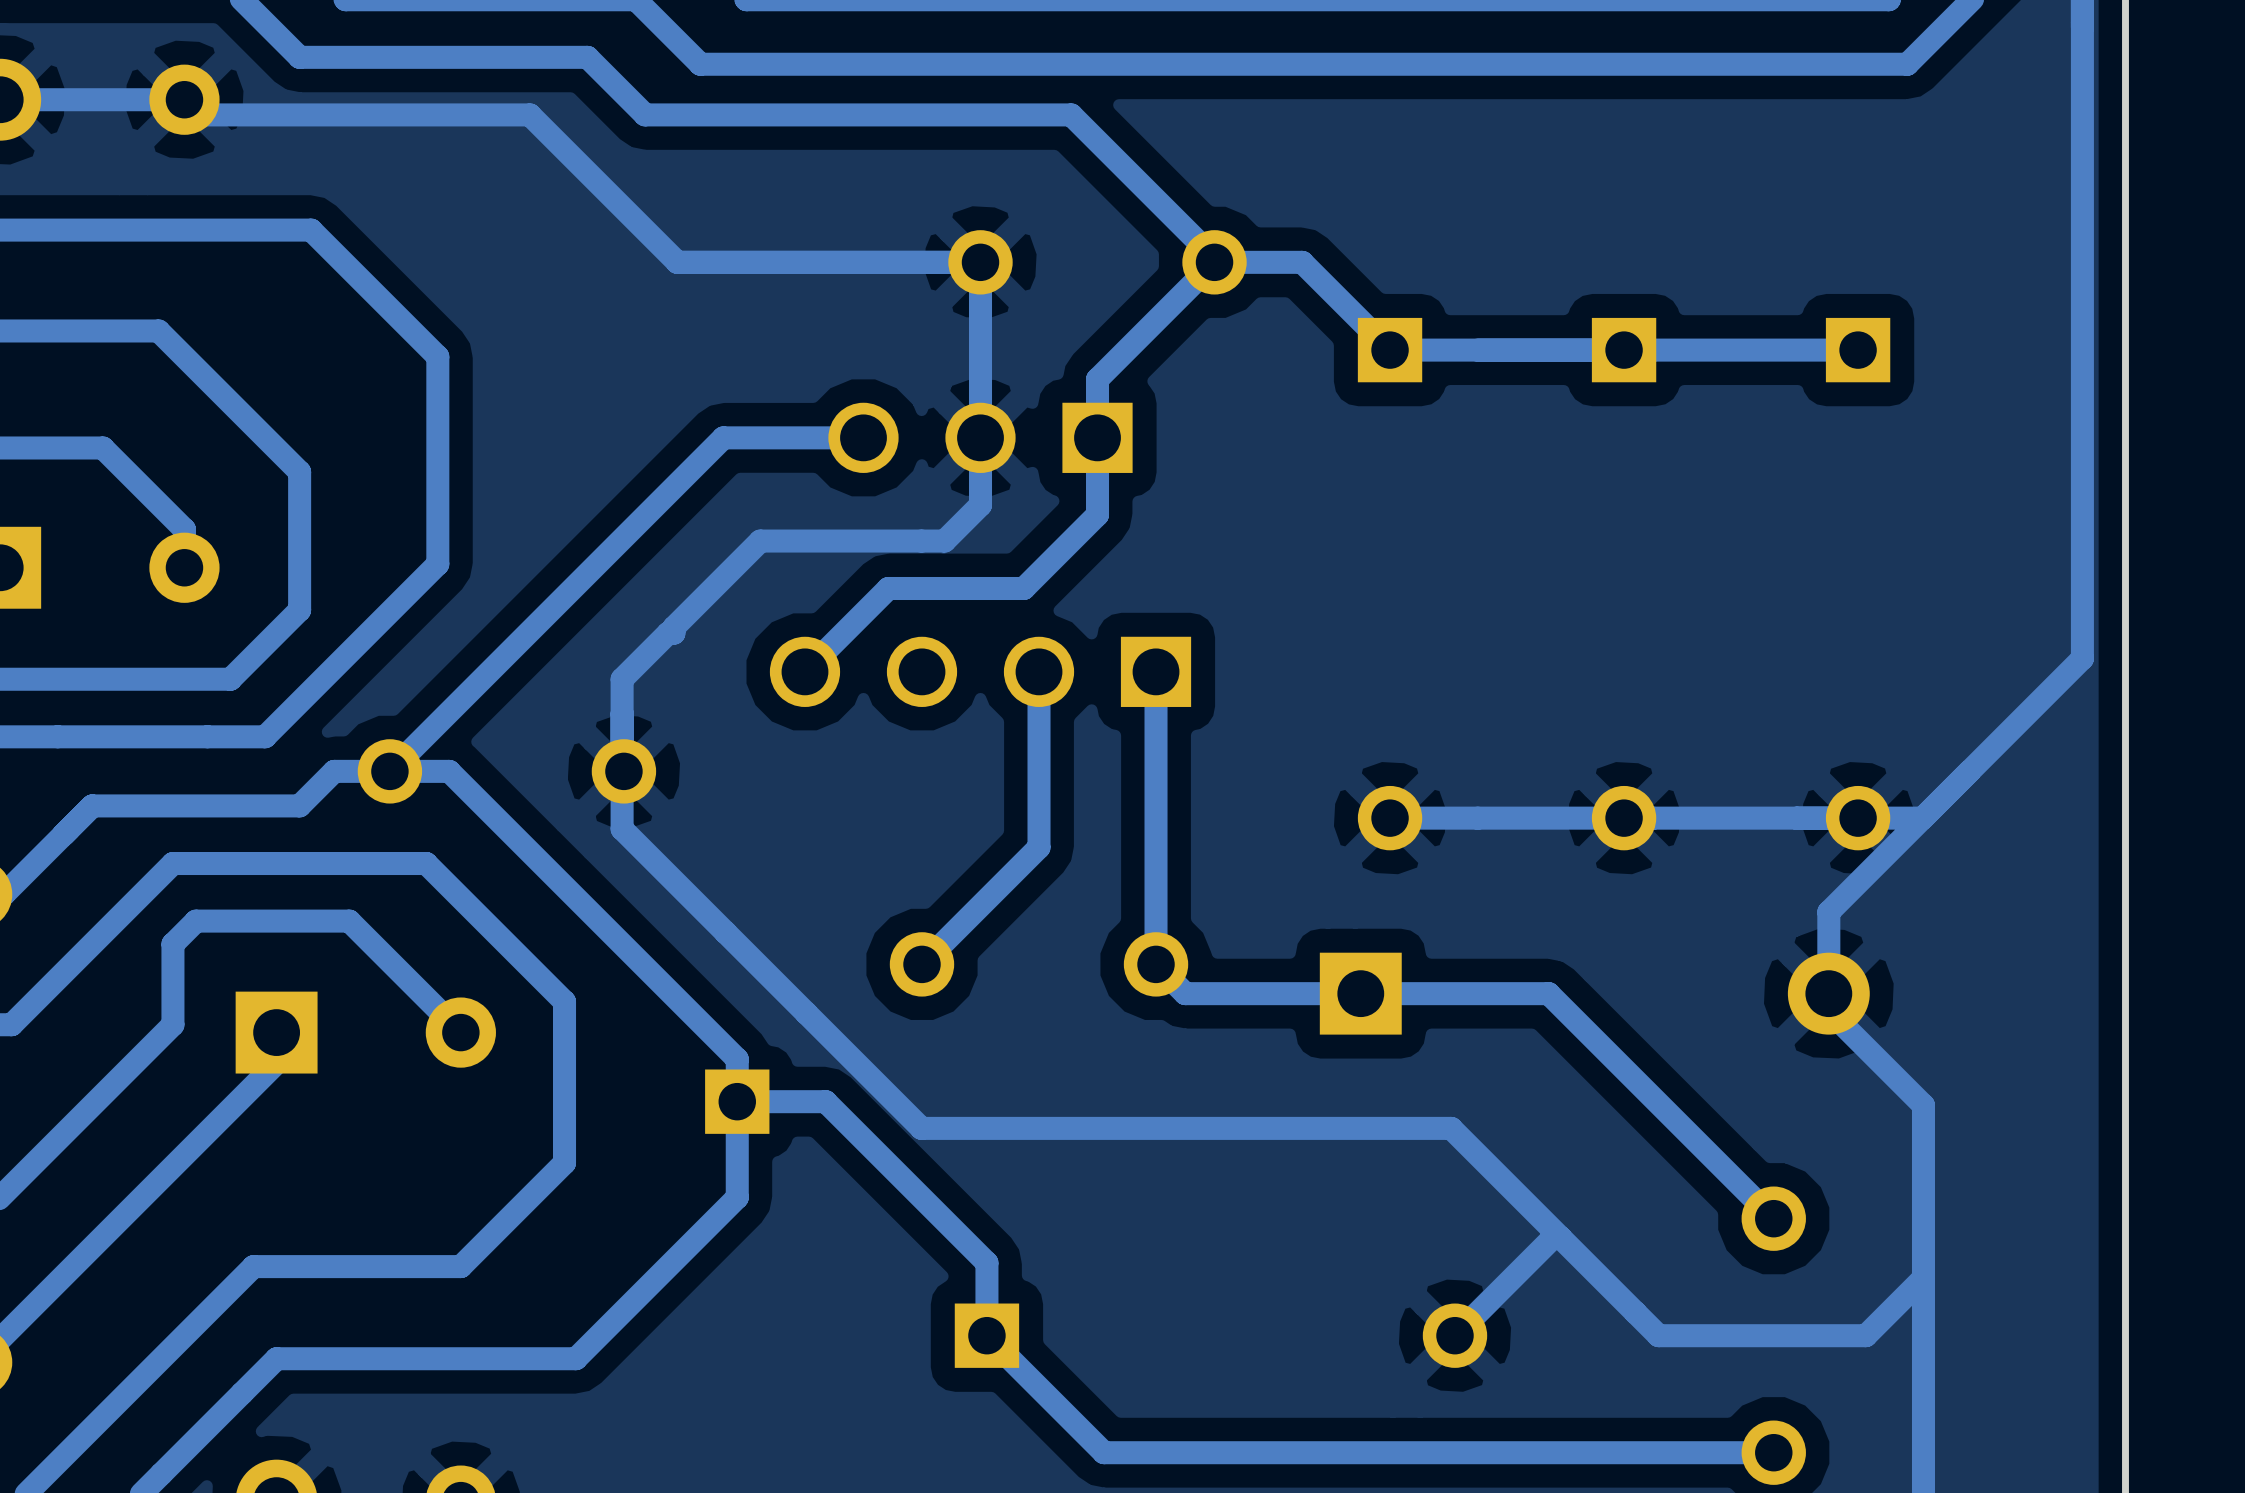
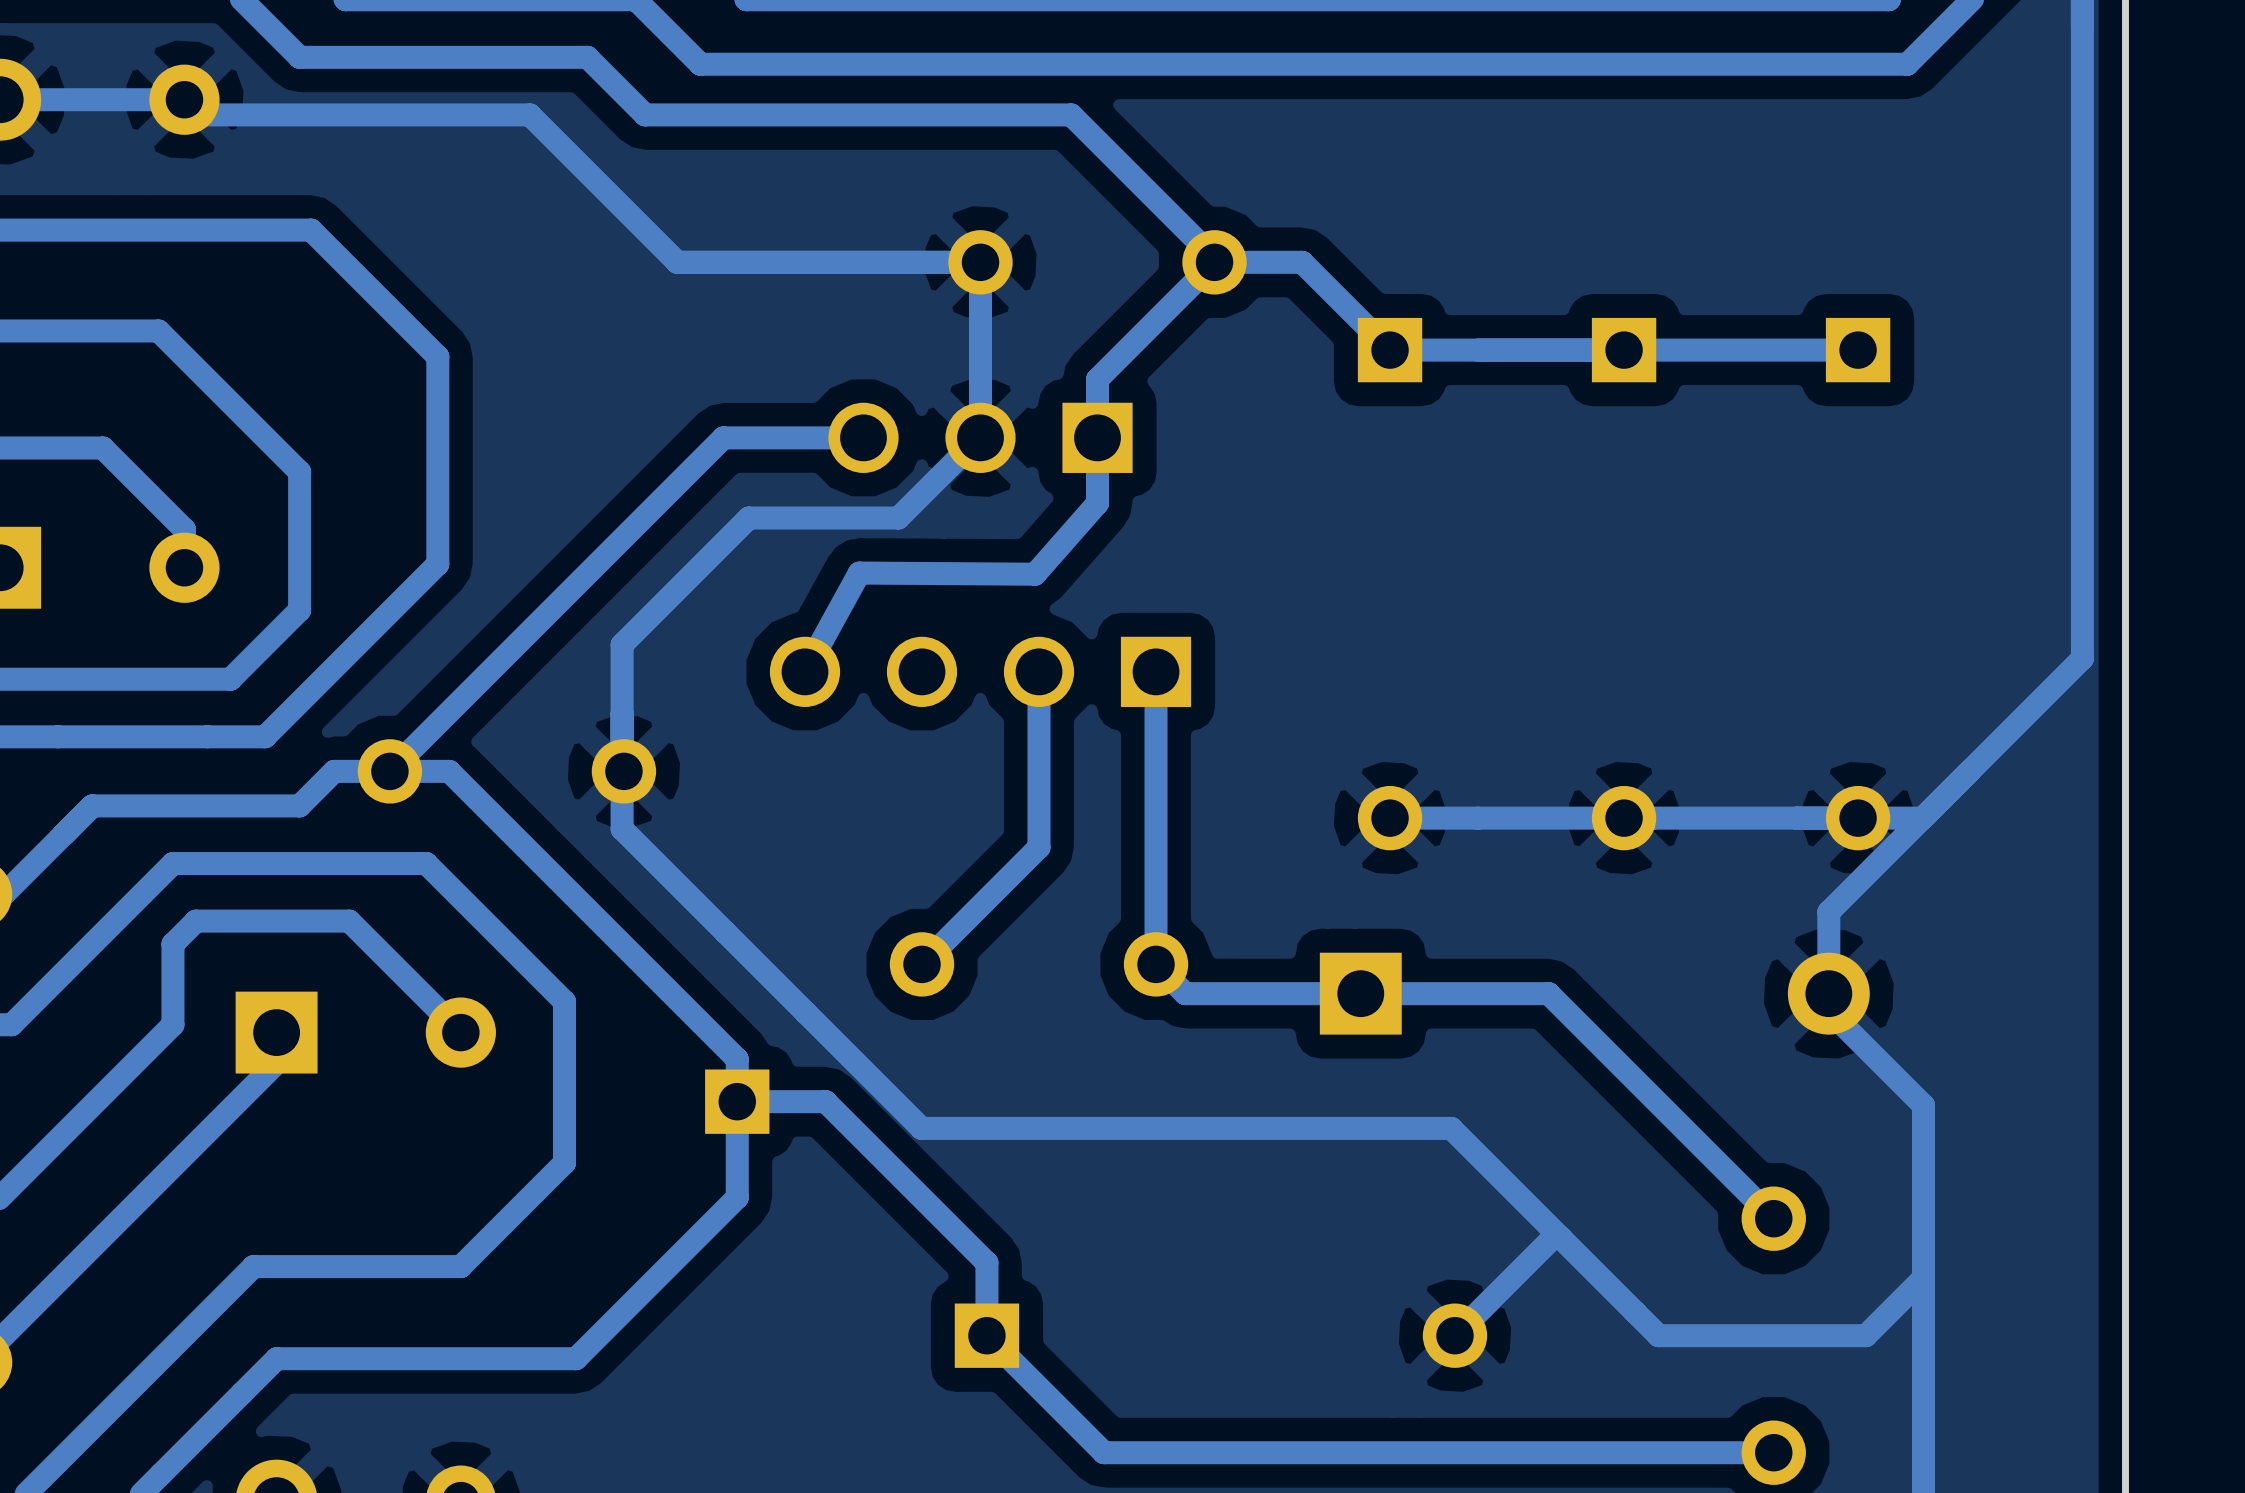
track: (980, 437) (980, 505) (944, 541) (760, 541) (673, 627) (673, 633) (668, 633) (622, 679) -> (980, 437) (898, 518) (748, 518) (622, 644) (622, 679)
track: (1097, 503) (1097, 514) (1023, 588) (888, 588) (804, 671) -> (1097, 503) (1035, 574) (859, 573) (804, 671)

